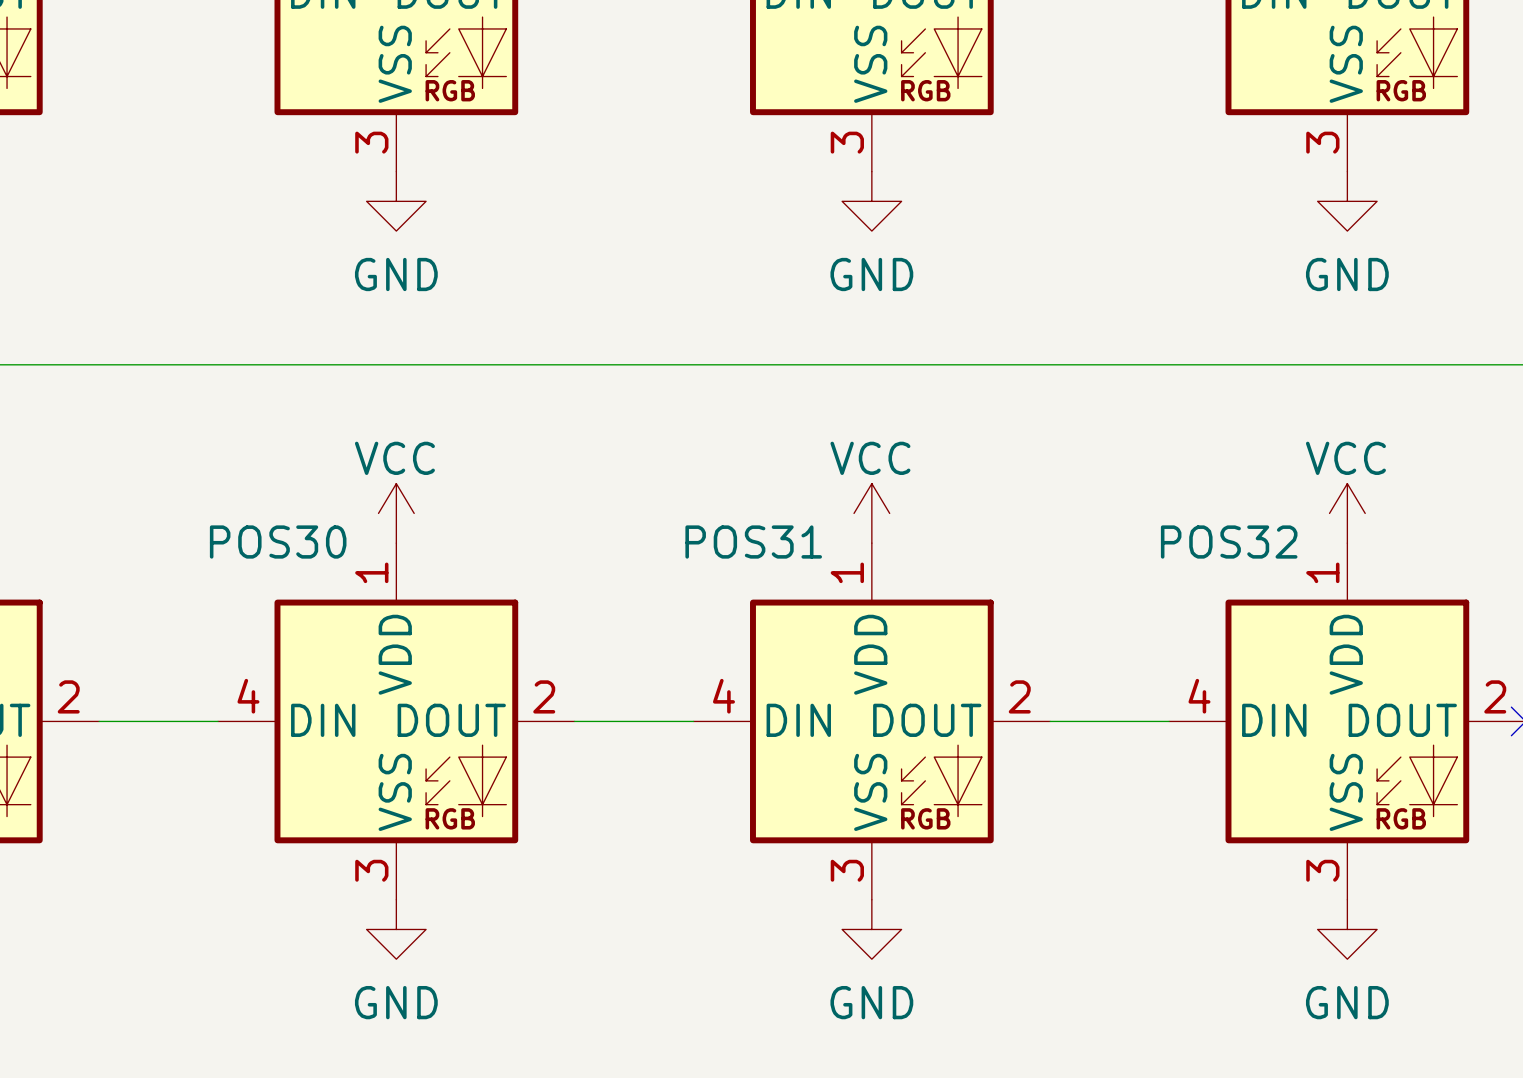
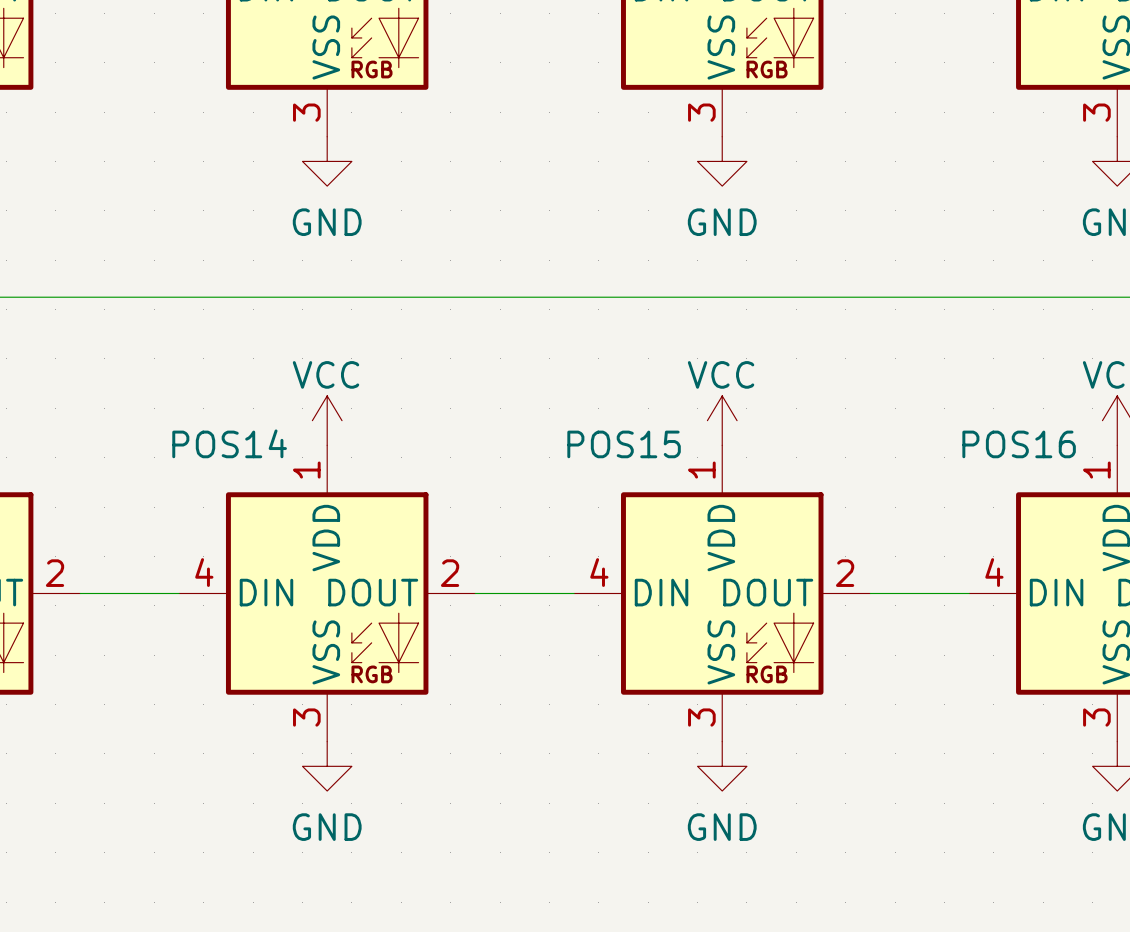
POS30 name: POS30 (278, 542) -> POS14 (229, 443)
POS31 name: POS31 (753, 542) -> POS15 (624, 444)
POS32 name: POS32 (1229, 542) -> POS16 (1019, 444)

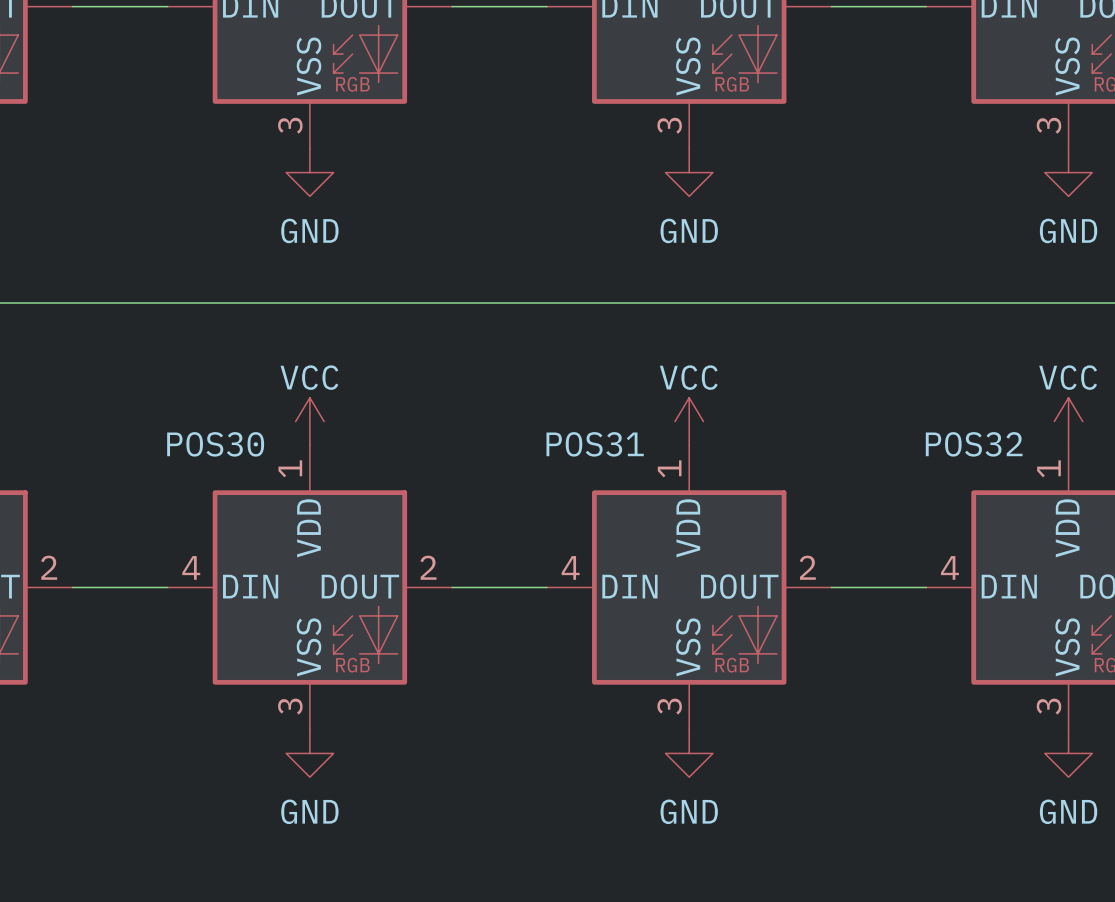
POS14 name: POS14 (229, 443) -> POS30 (215, 444)
POS15 name: POS15 (624, 444) -> POS31 (595, 444)
POS16 name: POS16 (1019, 444) -> POS32 (974, 444)

